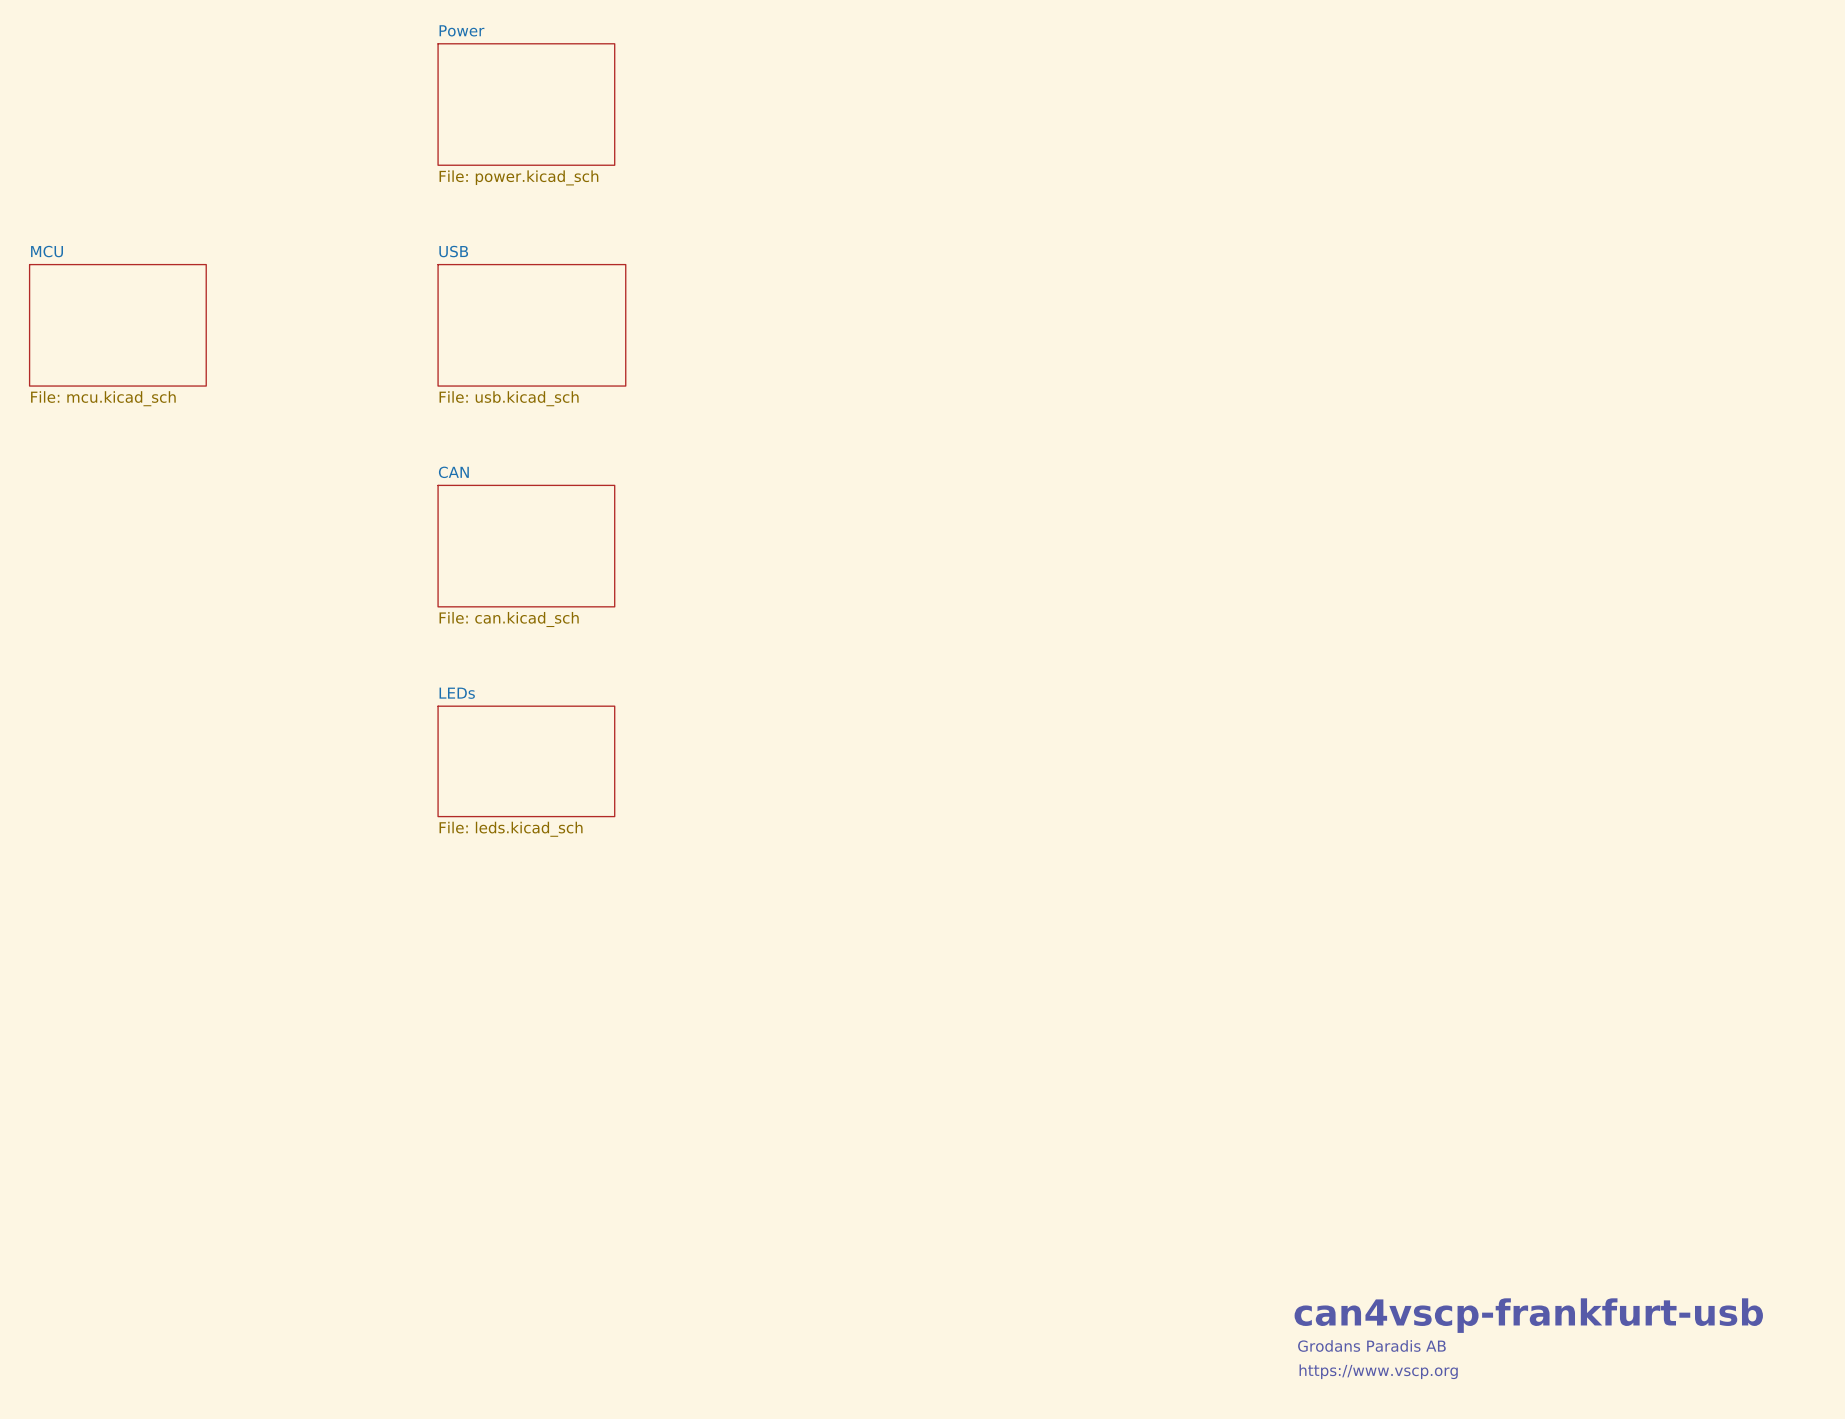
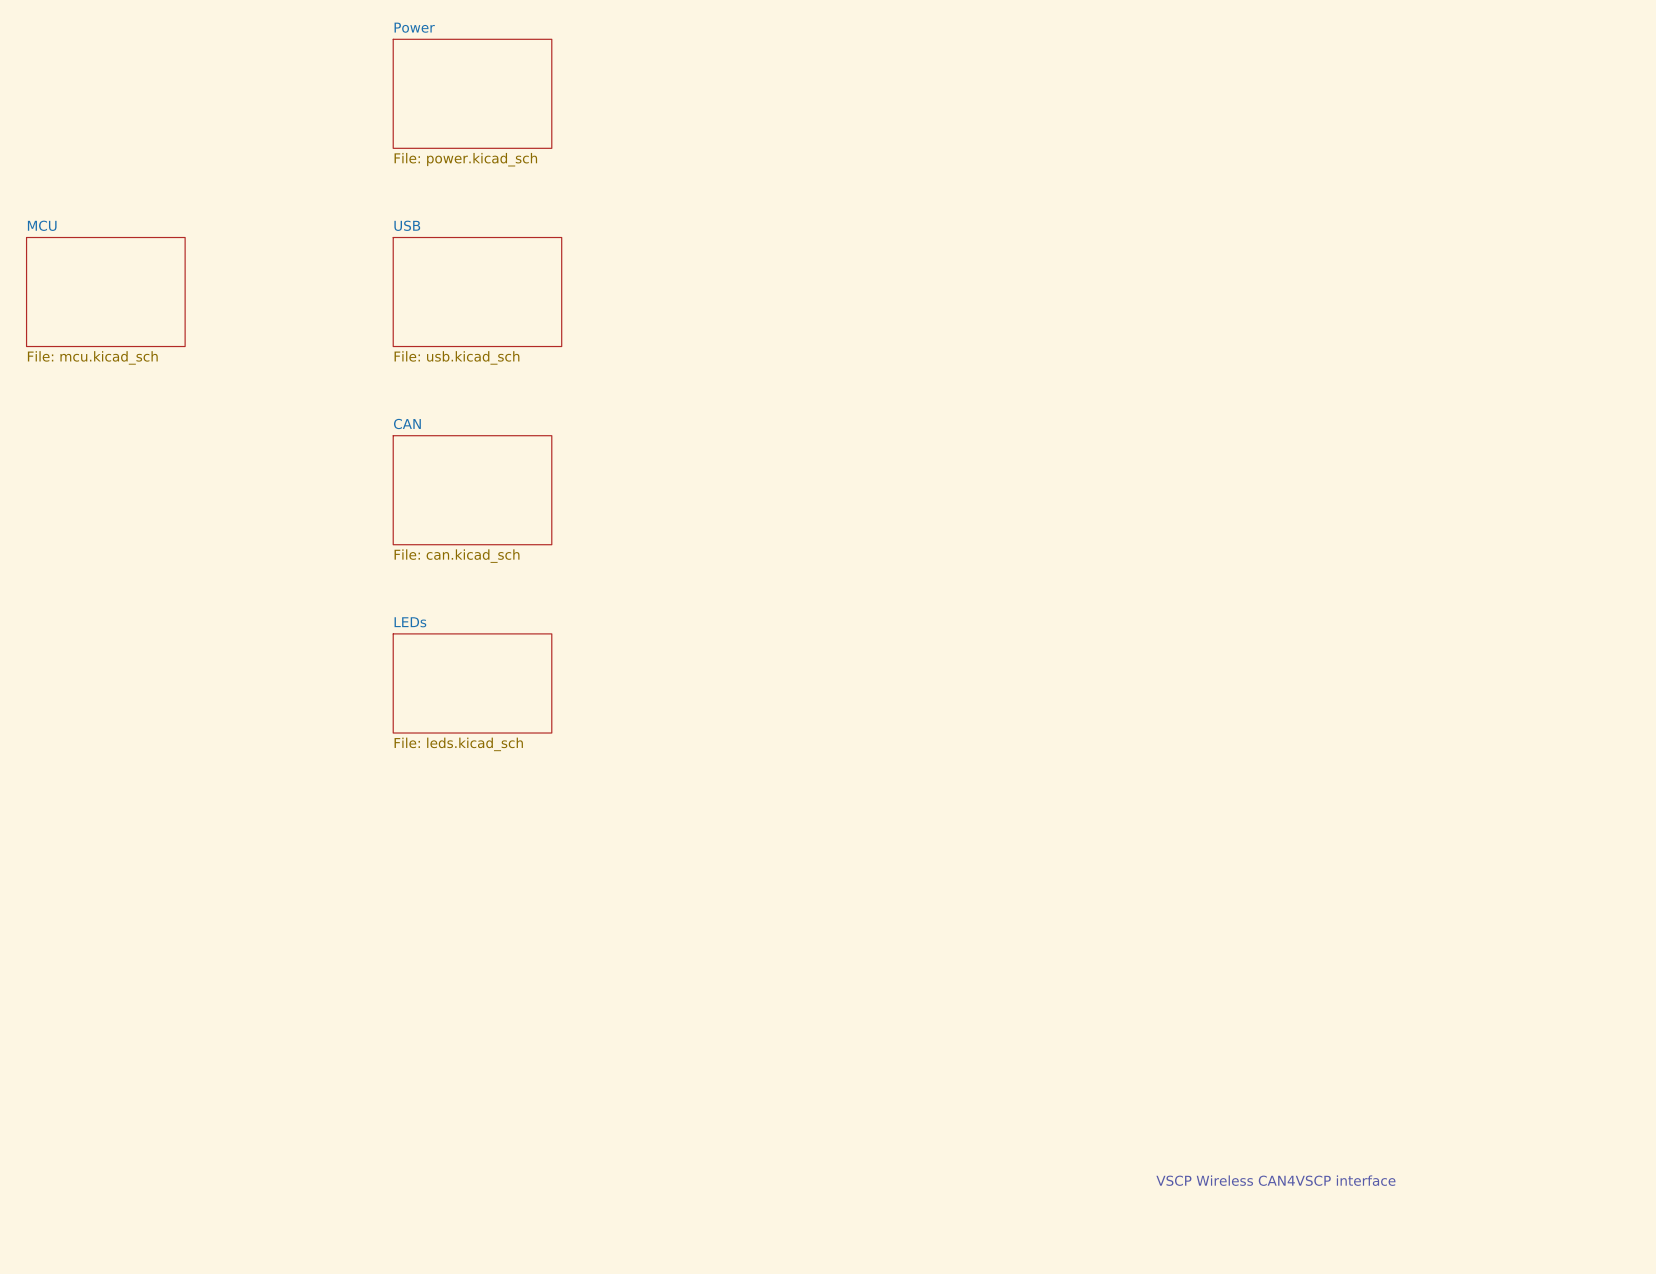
text: none -> VSCP Wireless CAN4VSCP interface (1275, 1180)
text: can4vscp-frankfurt-usb (1528, 1315) -> none
text: Grodans Paradis AB (1371, 1346) -> none
text: https://www.vscp.org (1378, 1371) -> none

